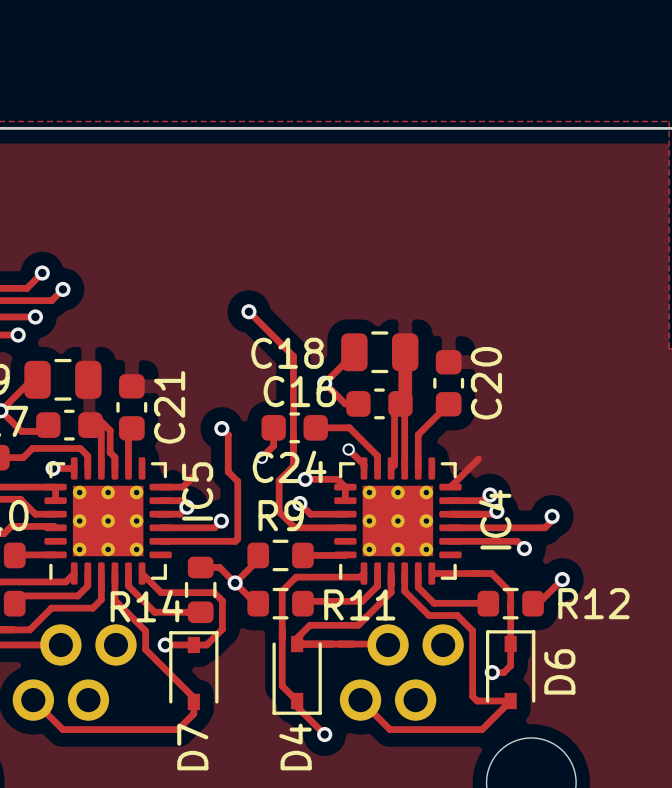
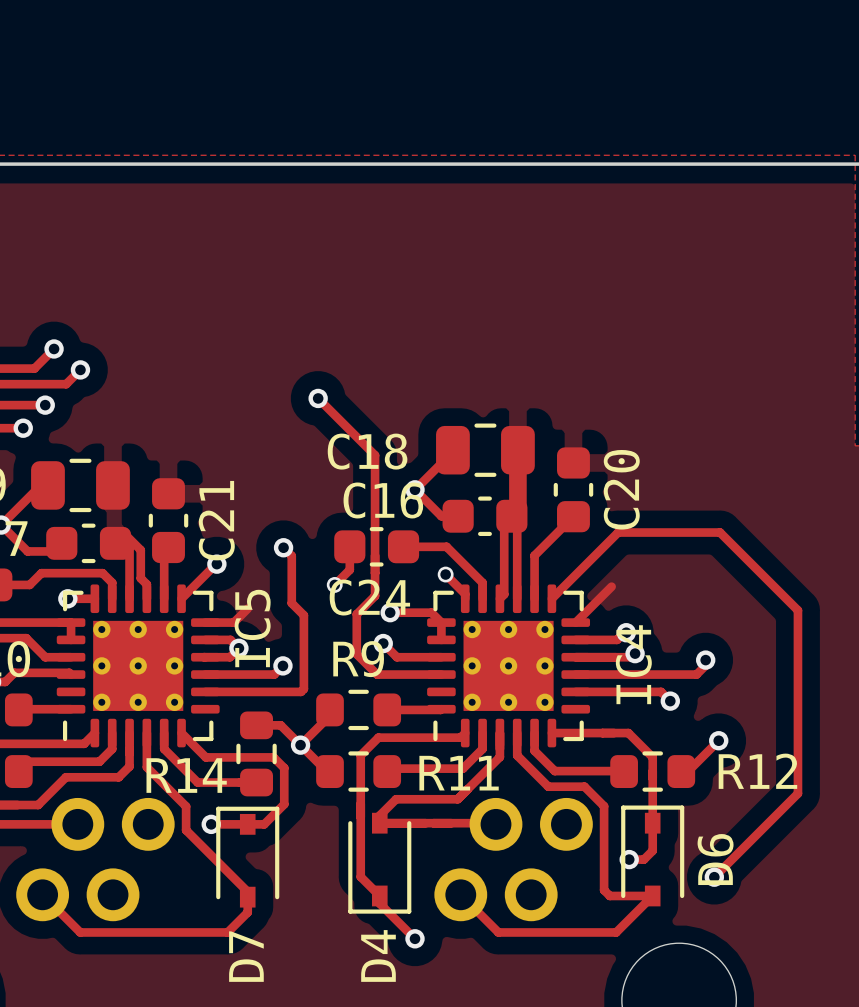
track: none -> (216, 564) (181, 598)
via: none -> (216, 564)
track: none -> (551, 598) (618, 532) (720, 532) (797, 610) (797, 793) (714, 877)
via: none -> (714, 877)

